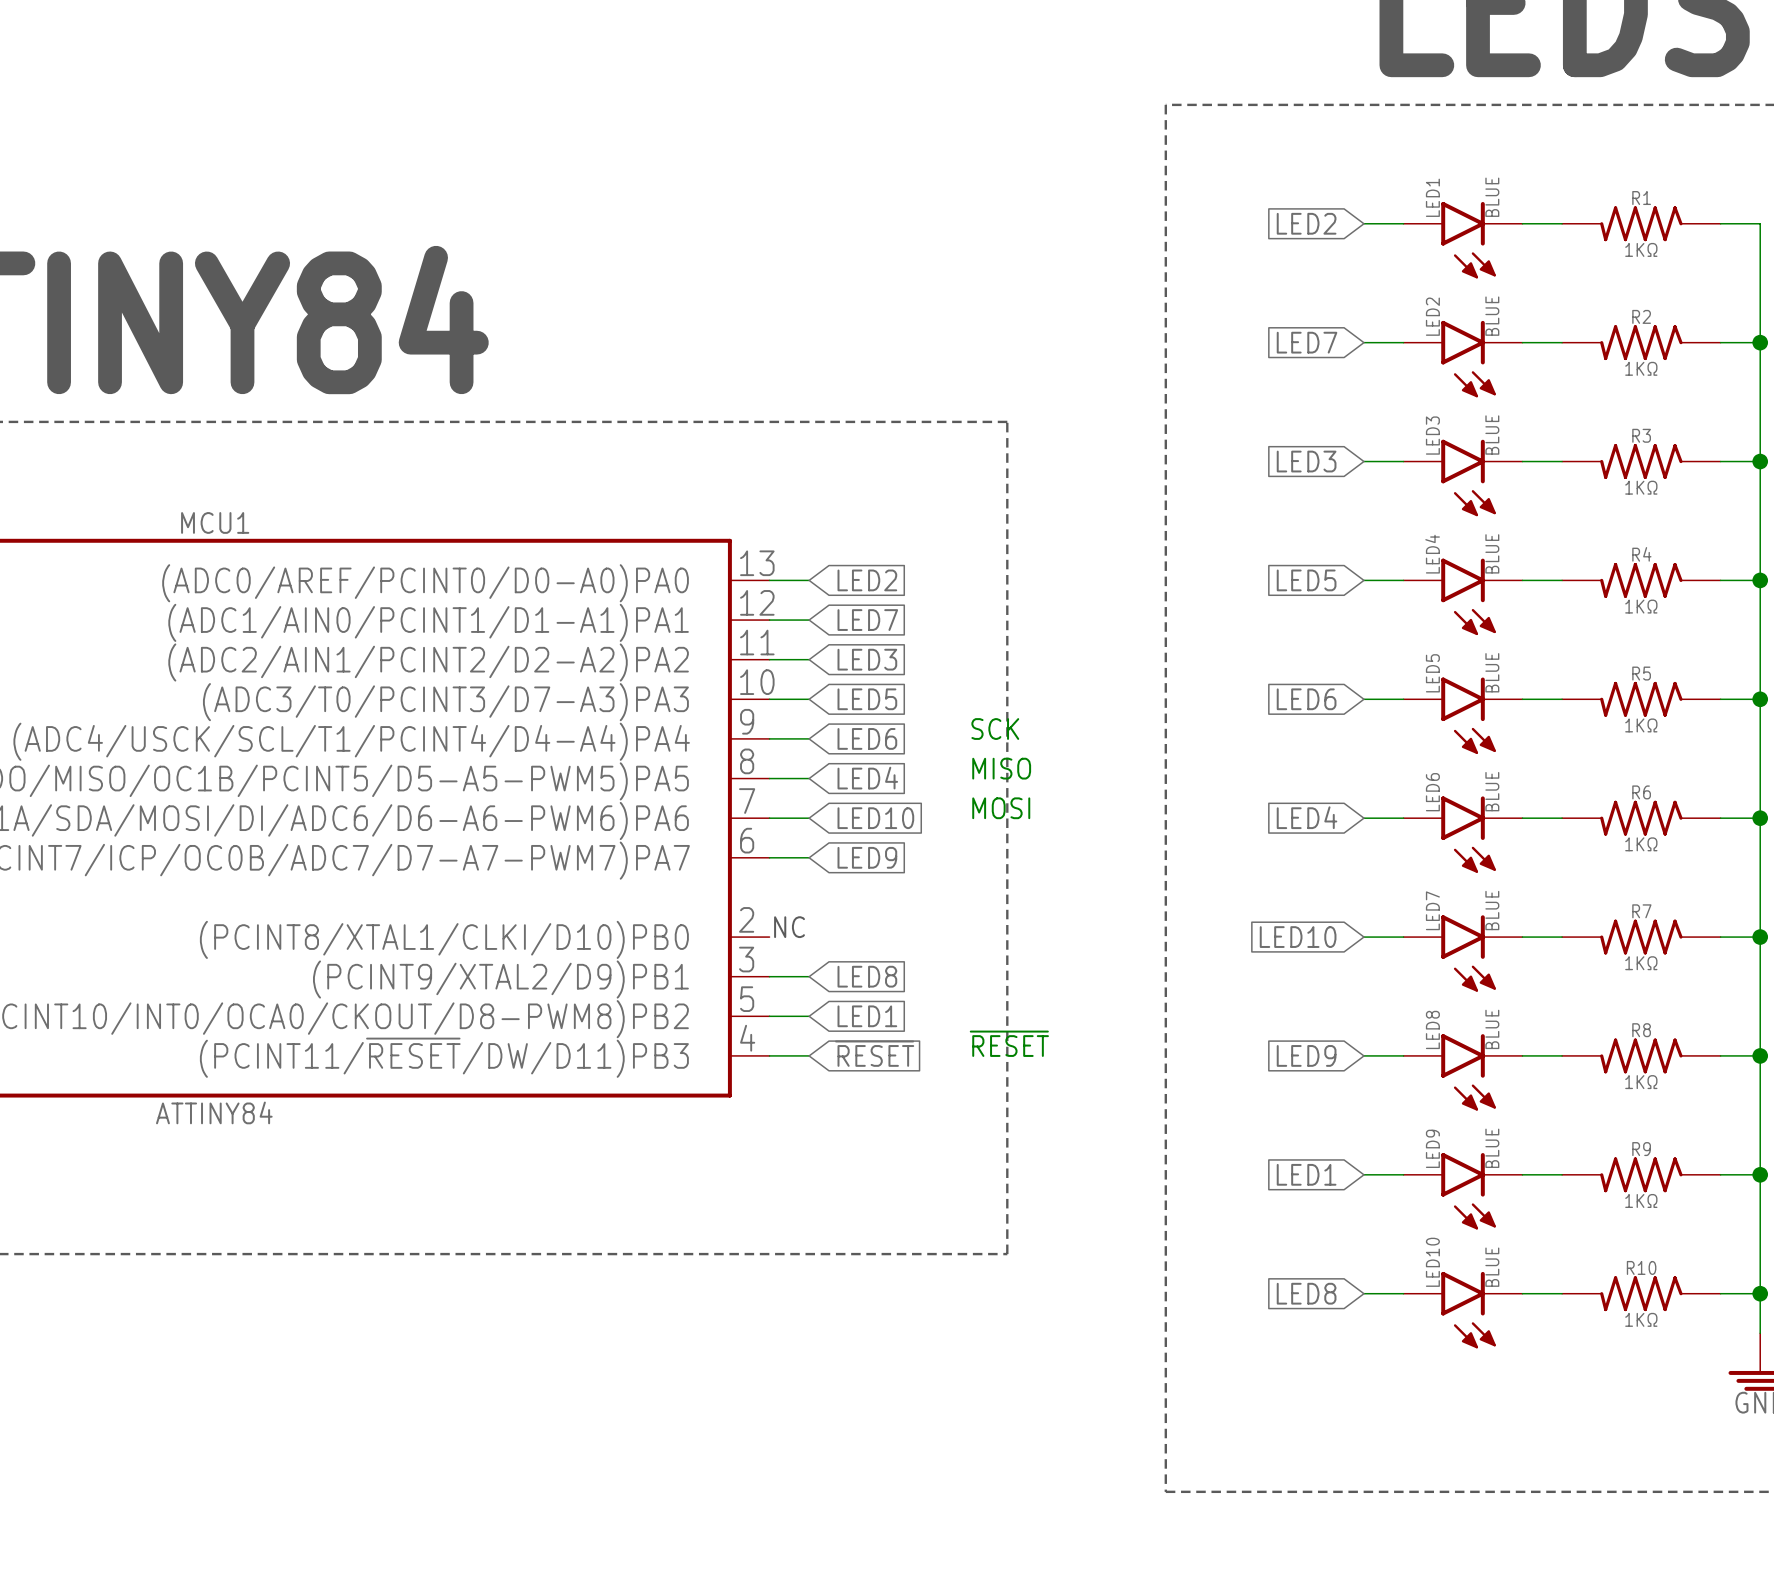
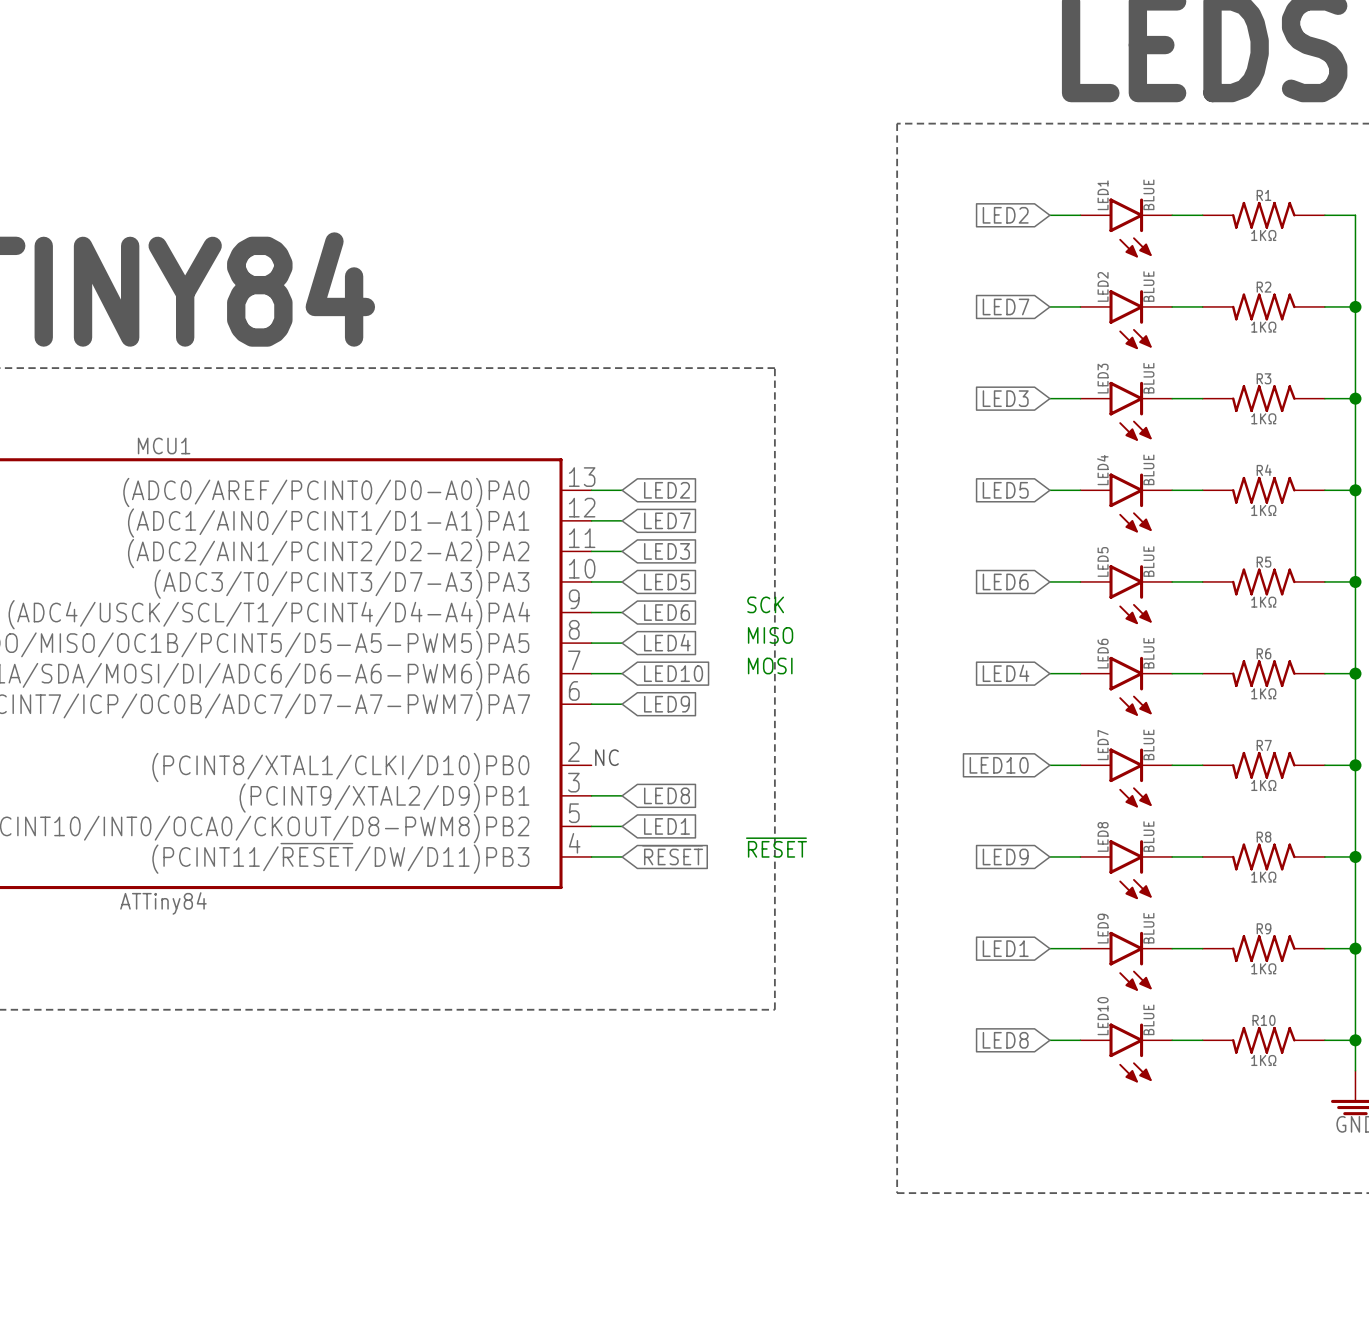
MCU1 value: ATTINY84 (214, 1112) -> ATTiny84 (163, 903)

